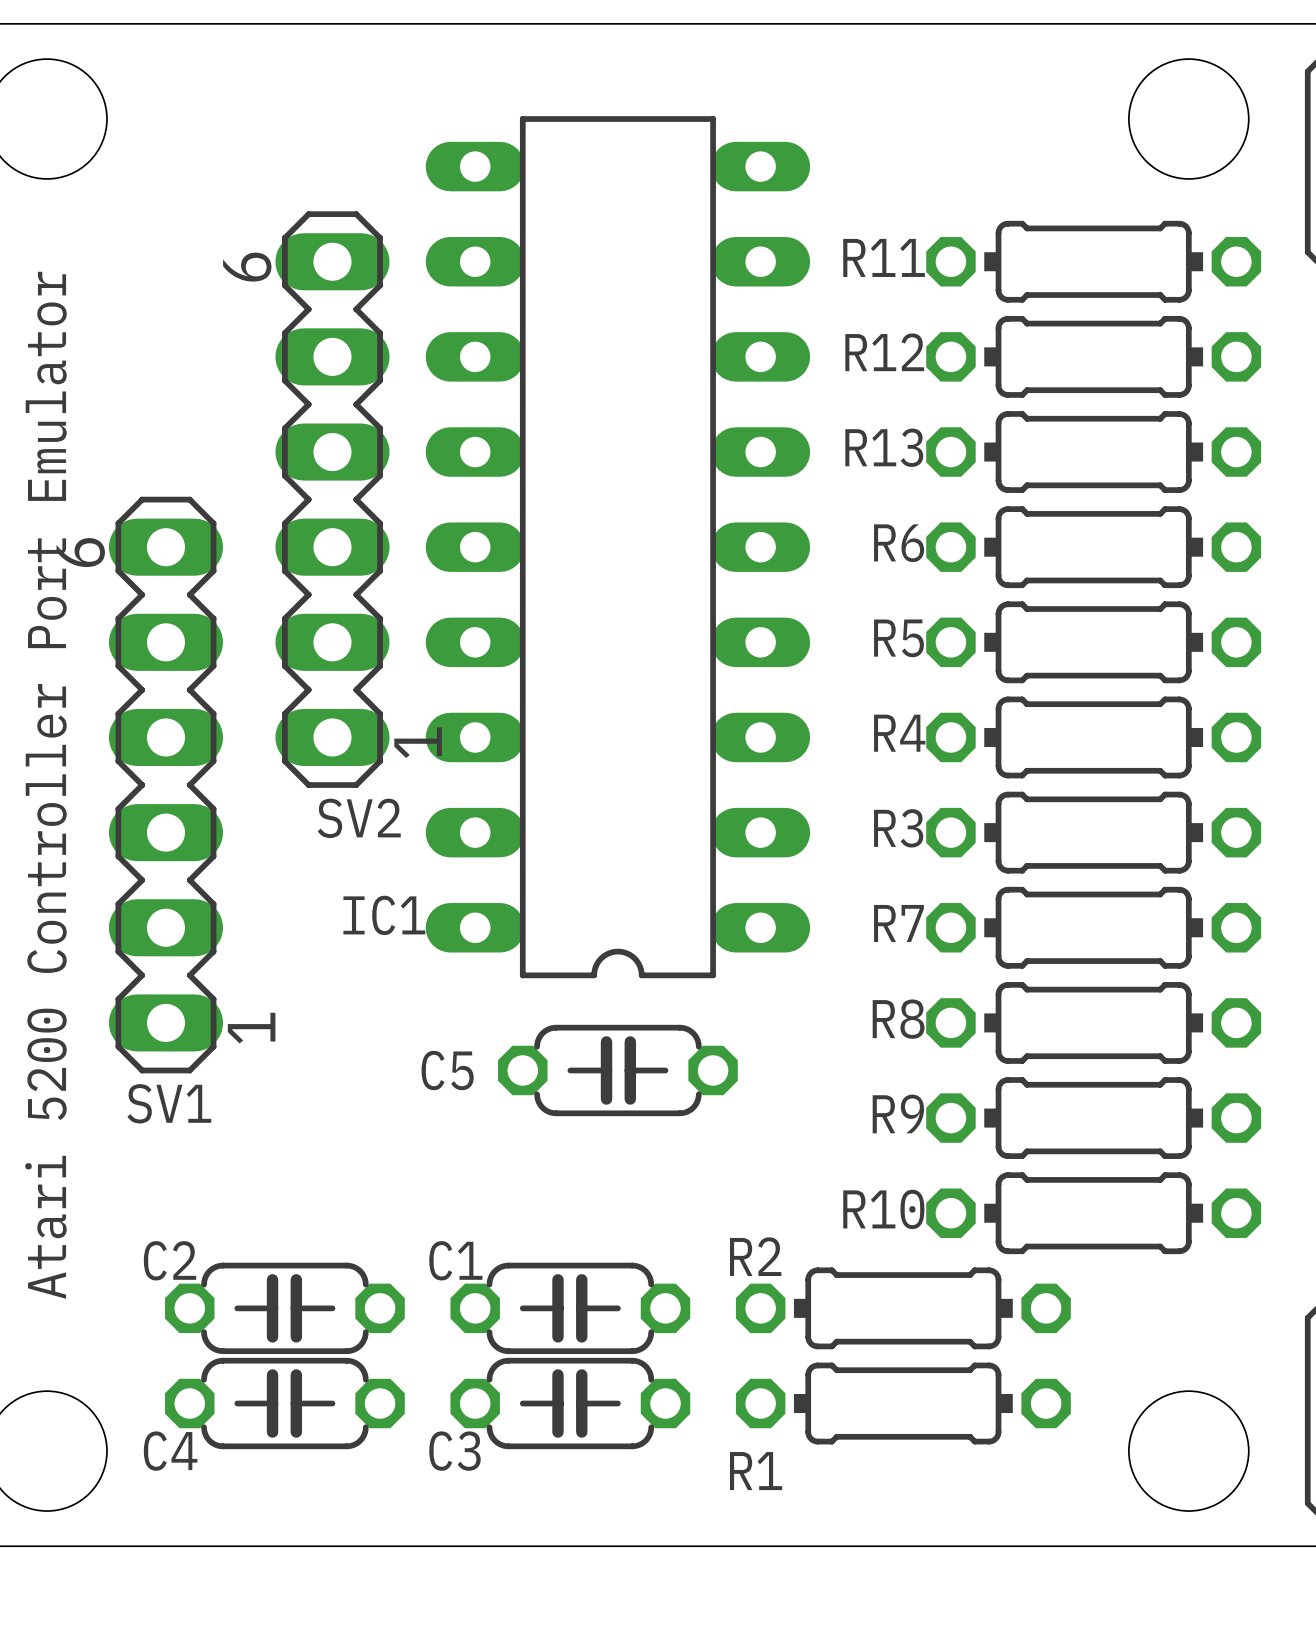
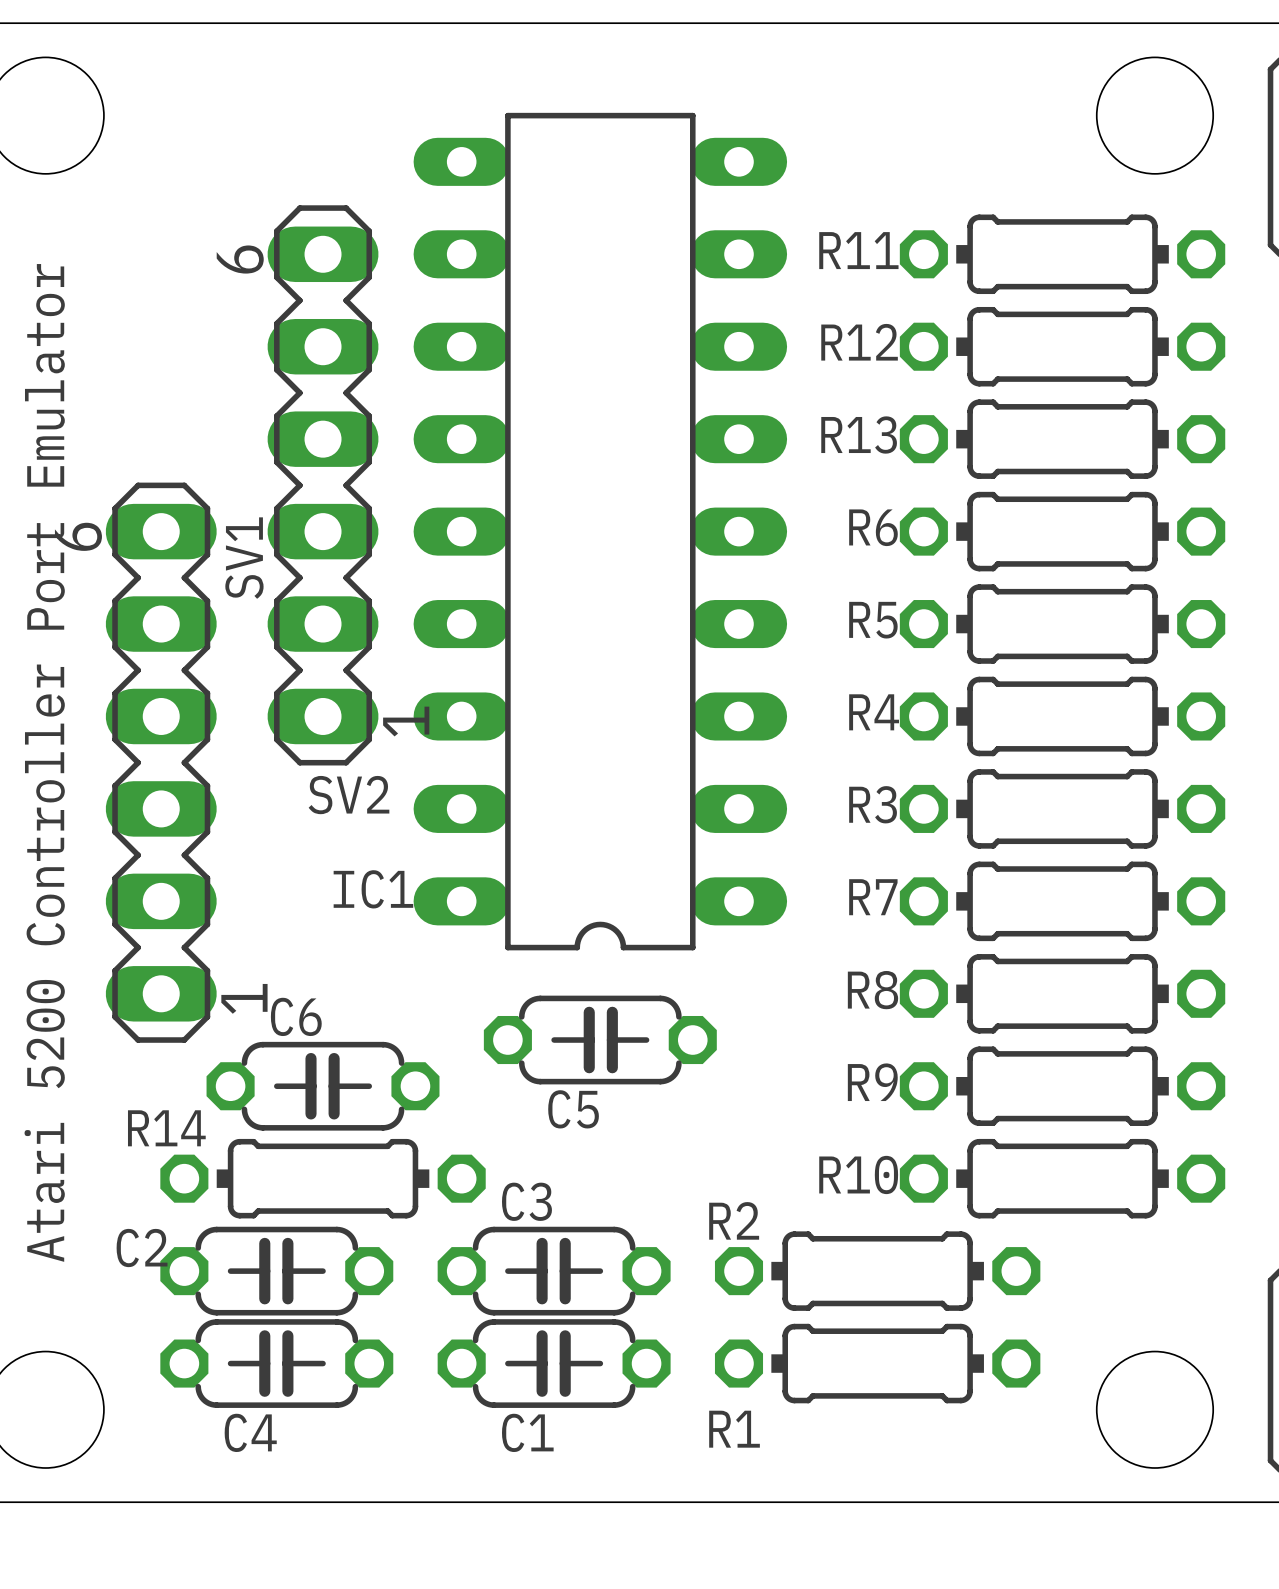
C5 name position: C5 (447, 1070) -> C5 (573, 1109)
SV1 name rotation: 0° (169, 1103) -> 90° counterclockwise (244, 558)
SV1 name position: SV1 (169, 1103) -> SV1 (244, 558)
C6: none -> (323, 1086)
R14: none -> (323, 1178)
C2 name position: C2 (170, 1260) -> C2 (142, 1248)
C1 name position: C1 (455, 1260) -> C1 (527, 1432)
C4 name position: C4 (170, 1451) -> C4 (250, 1432)
C3 name position: C3 (454, 1451) -> C3 (526, 1201)

